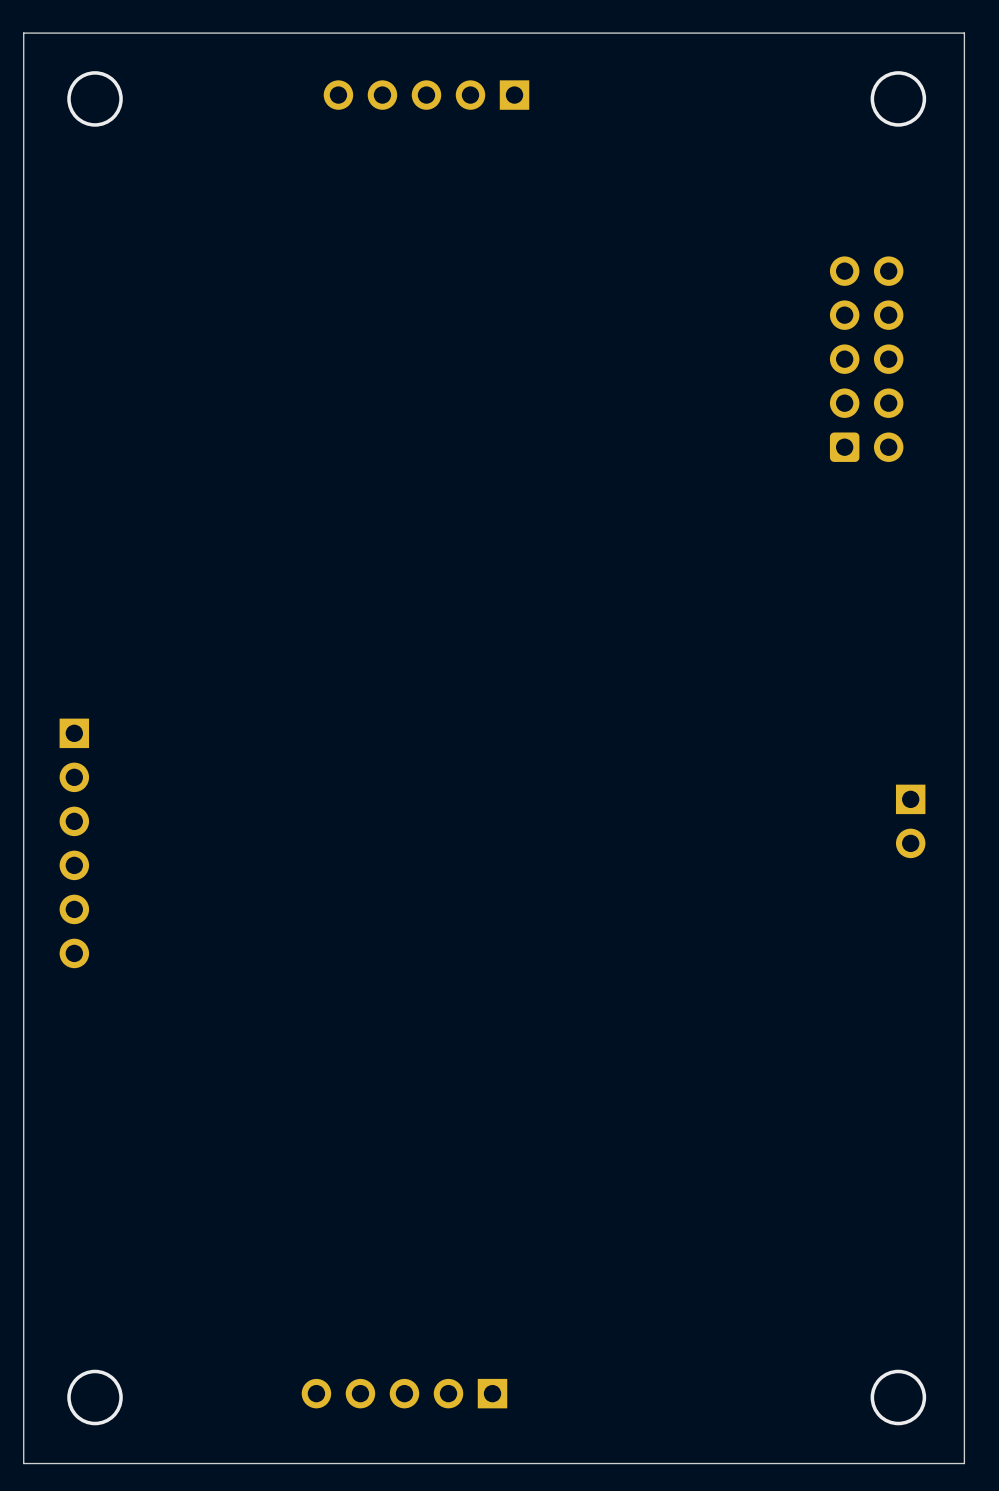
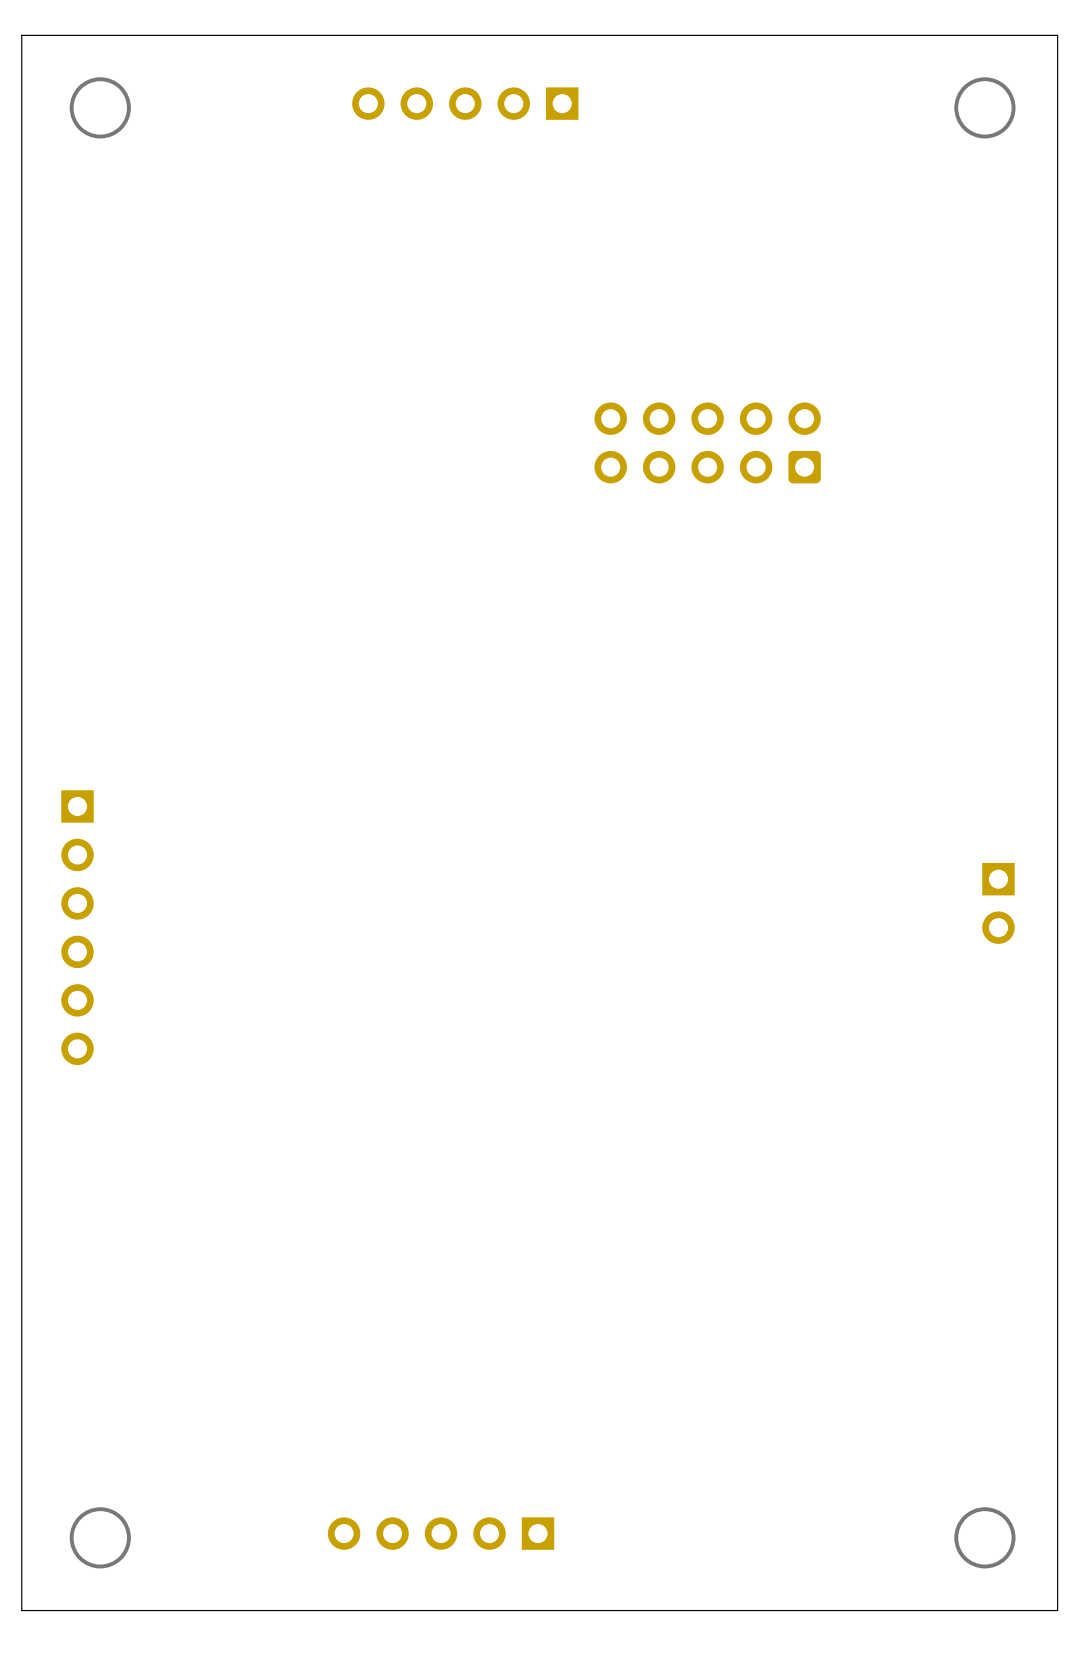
part rotation: 0° (866, 359) -> 90° counterclockwise (707, 442)
part position: (866, 359) -> (707, 442)

